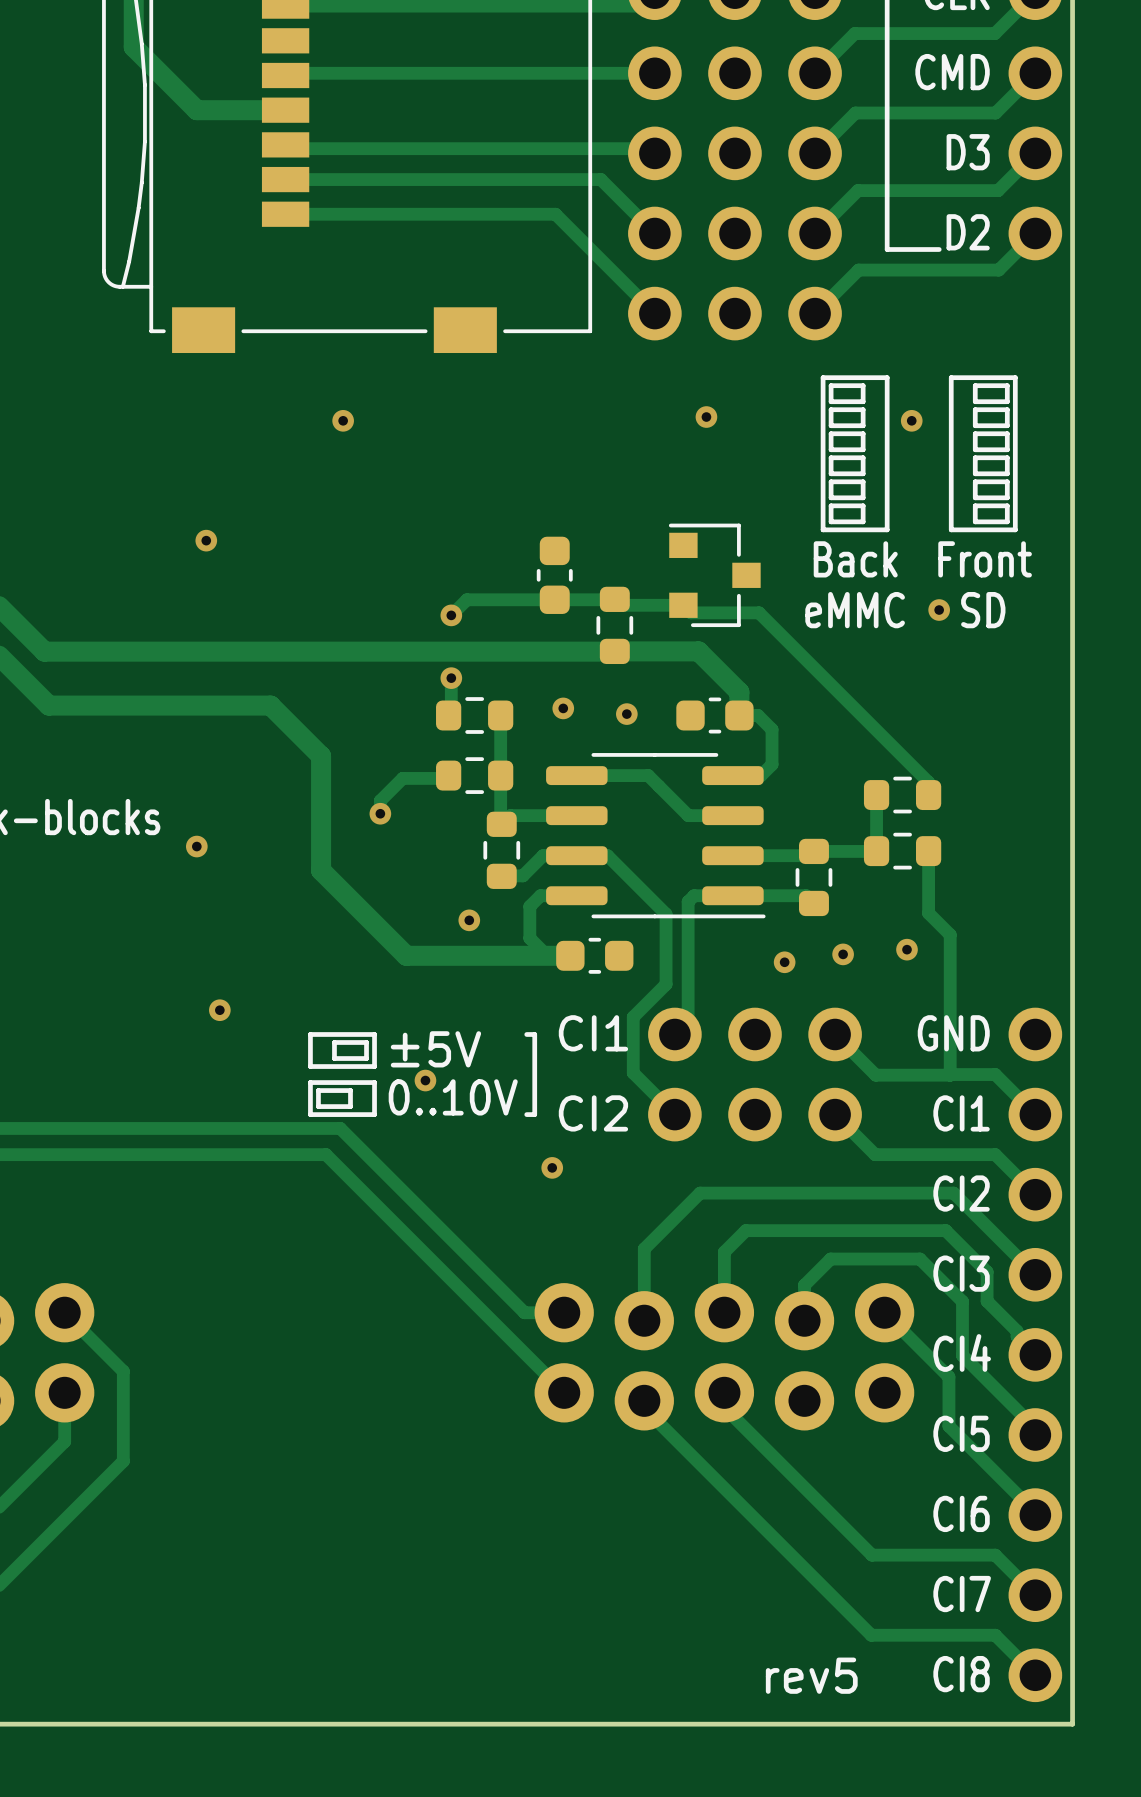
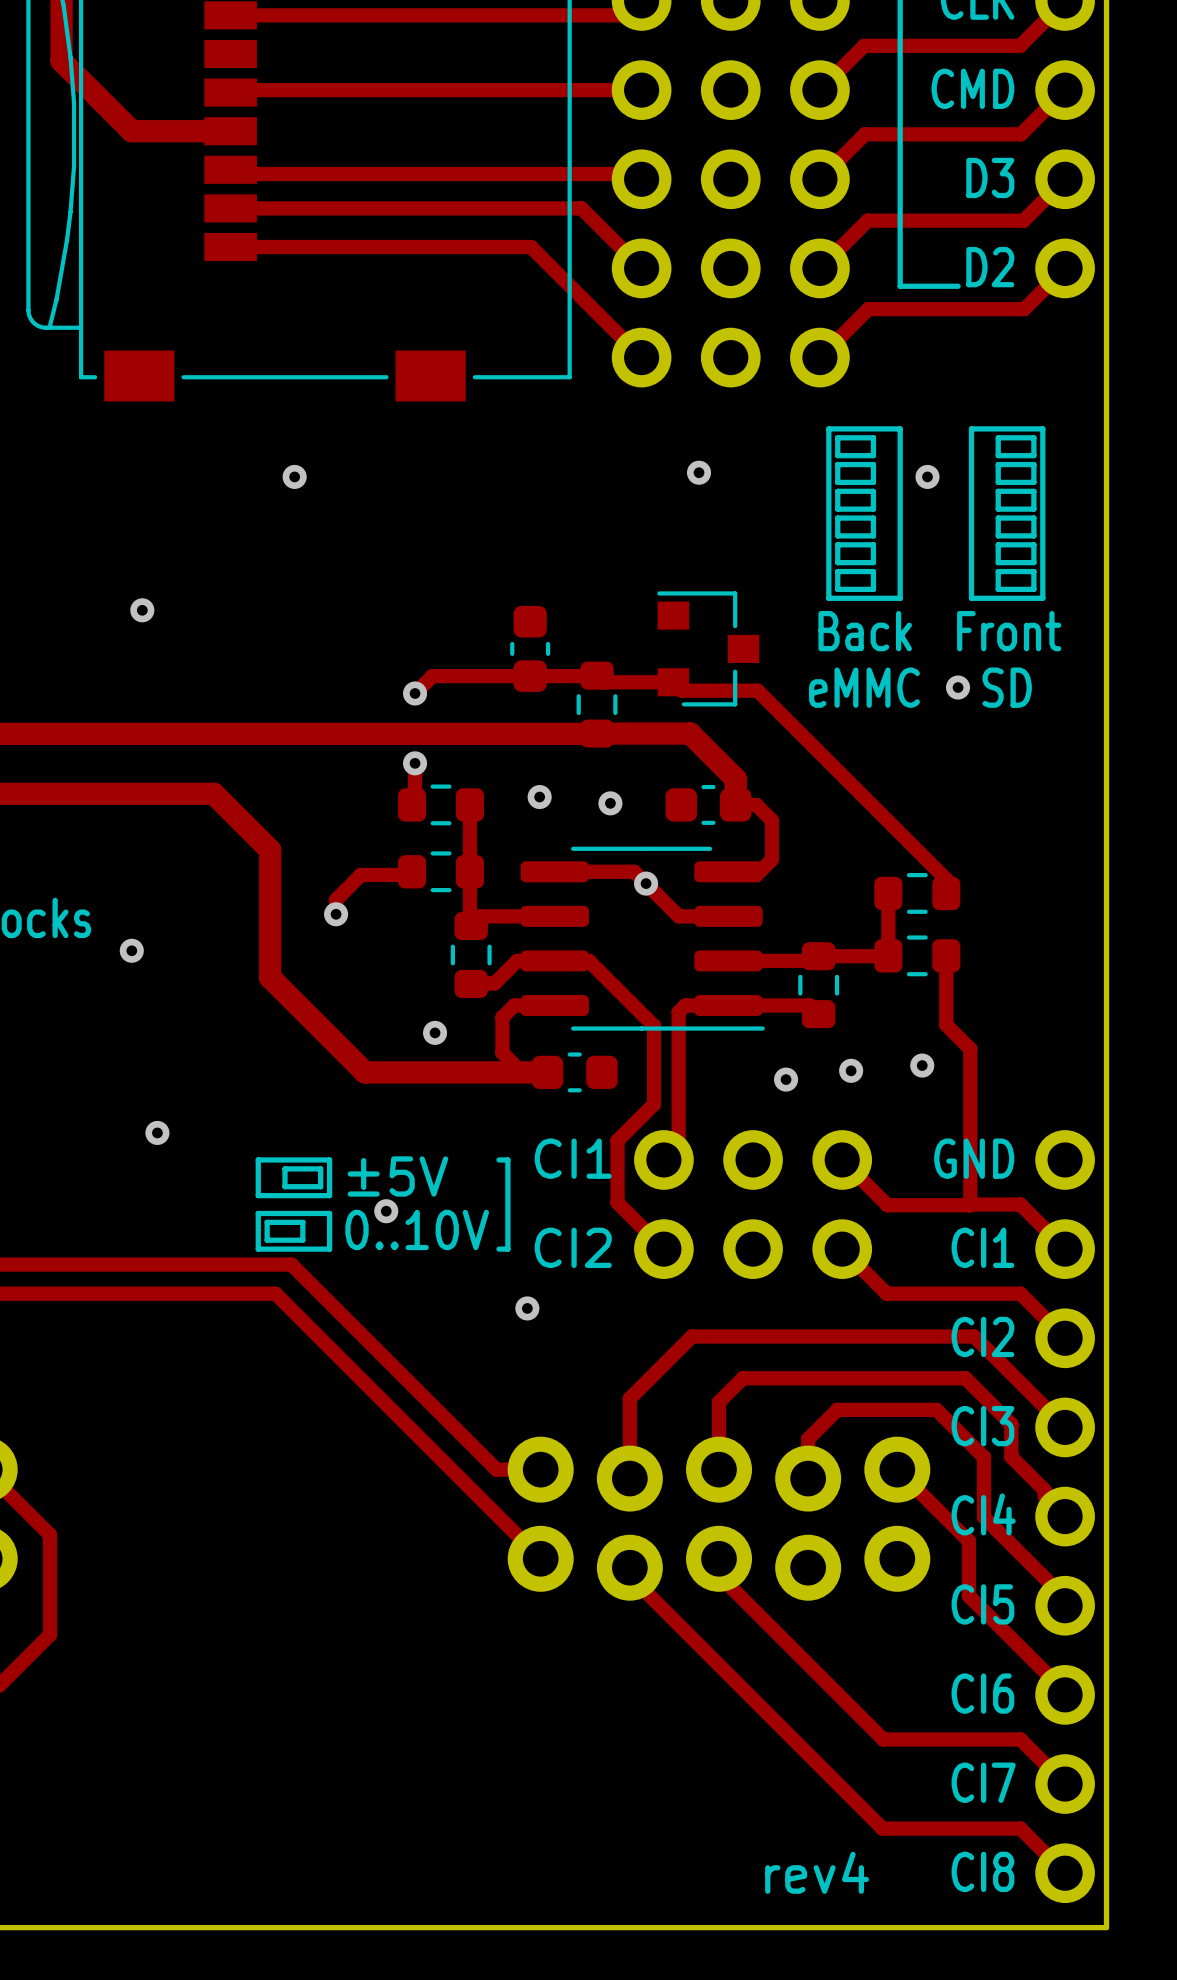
via: none -> (646, 883)
text: rev5 (811, 1675) -> rev4 (817, 1872)

